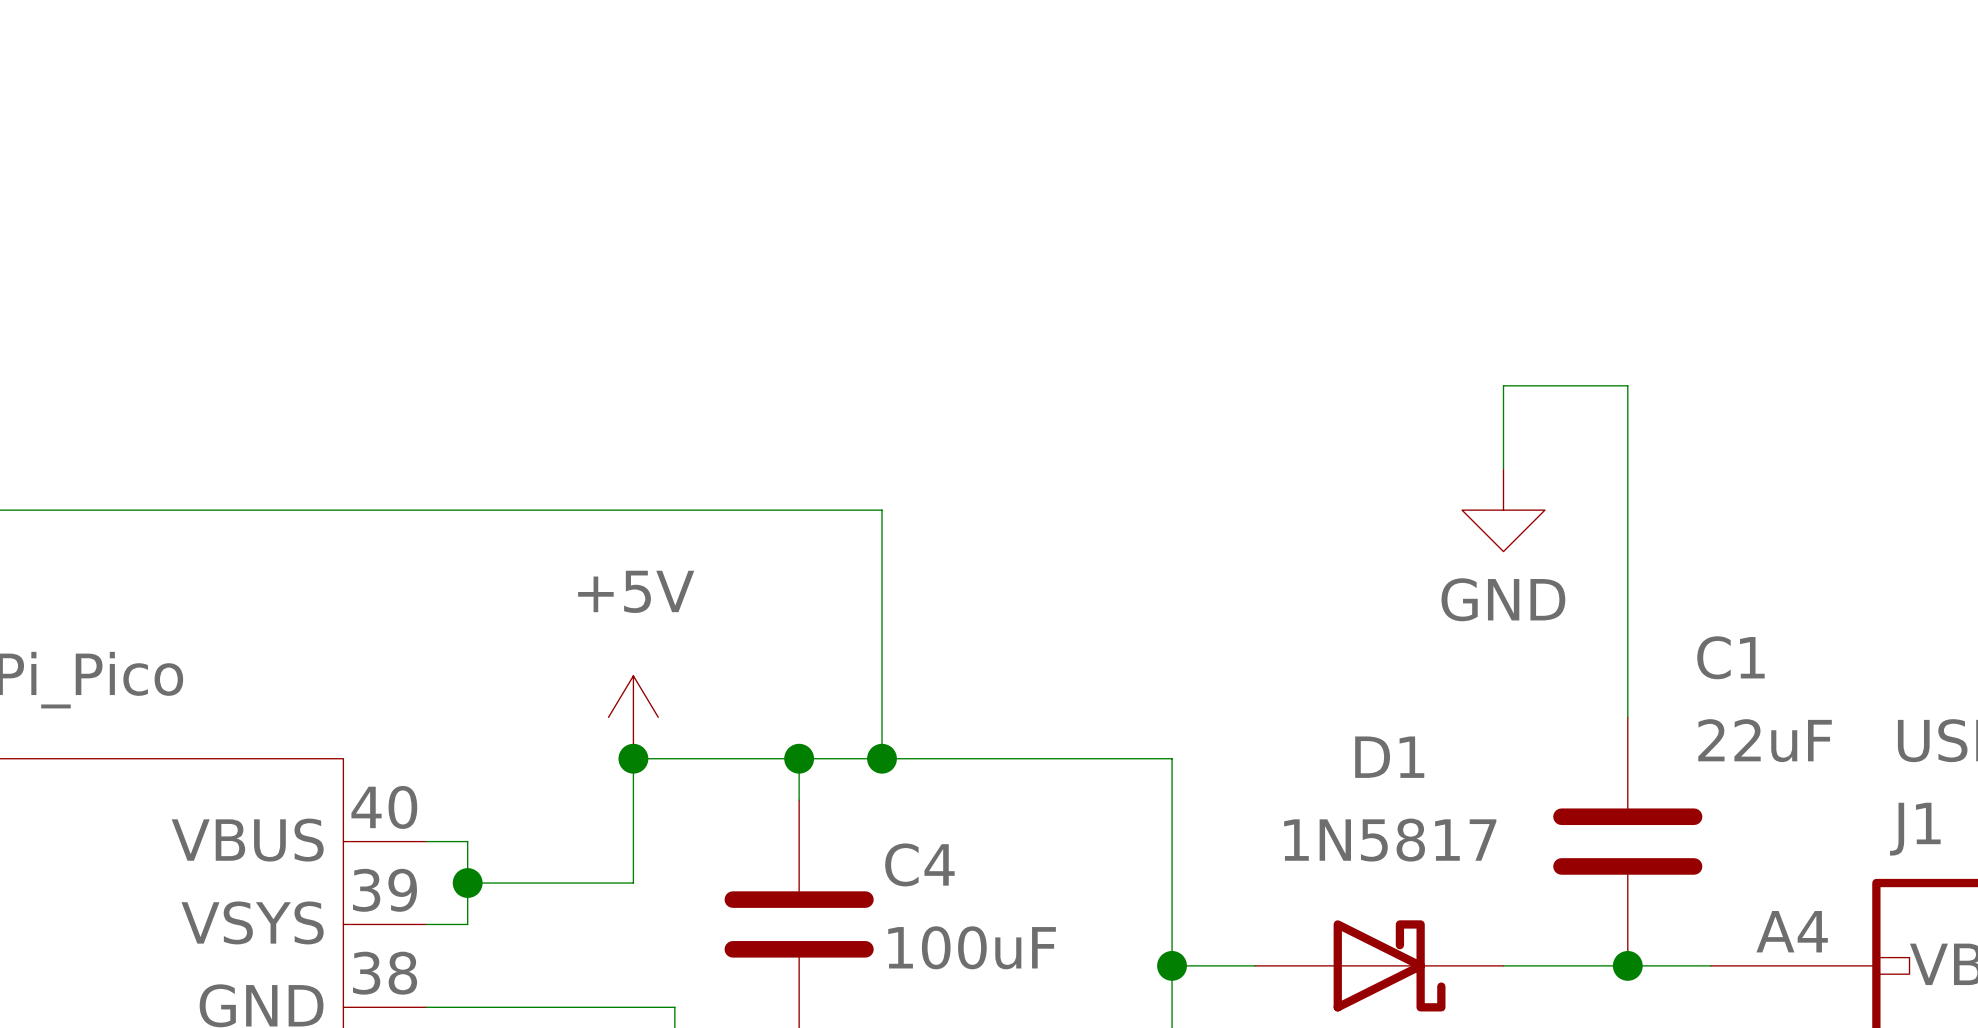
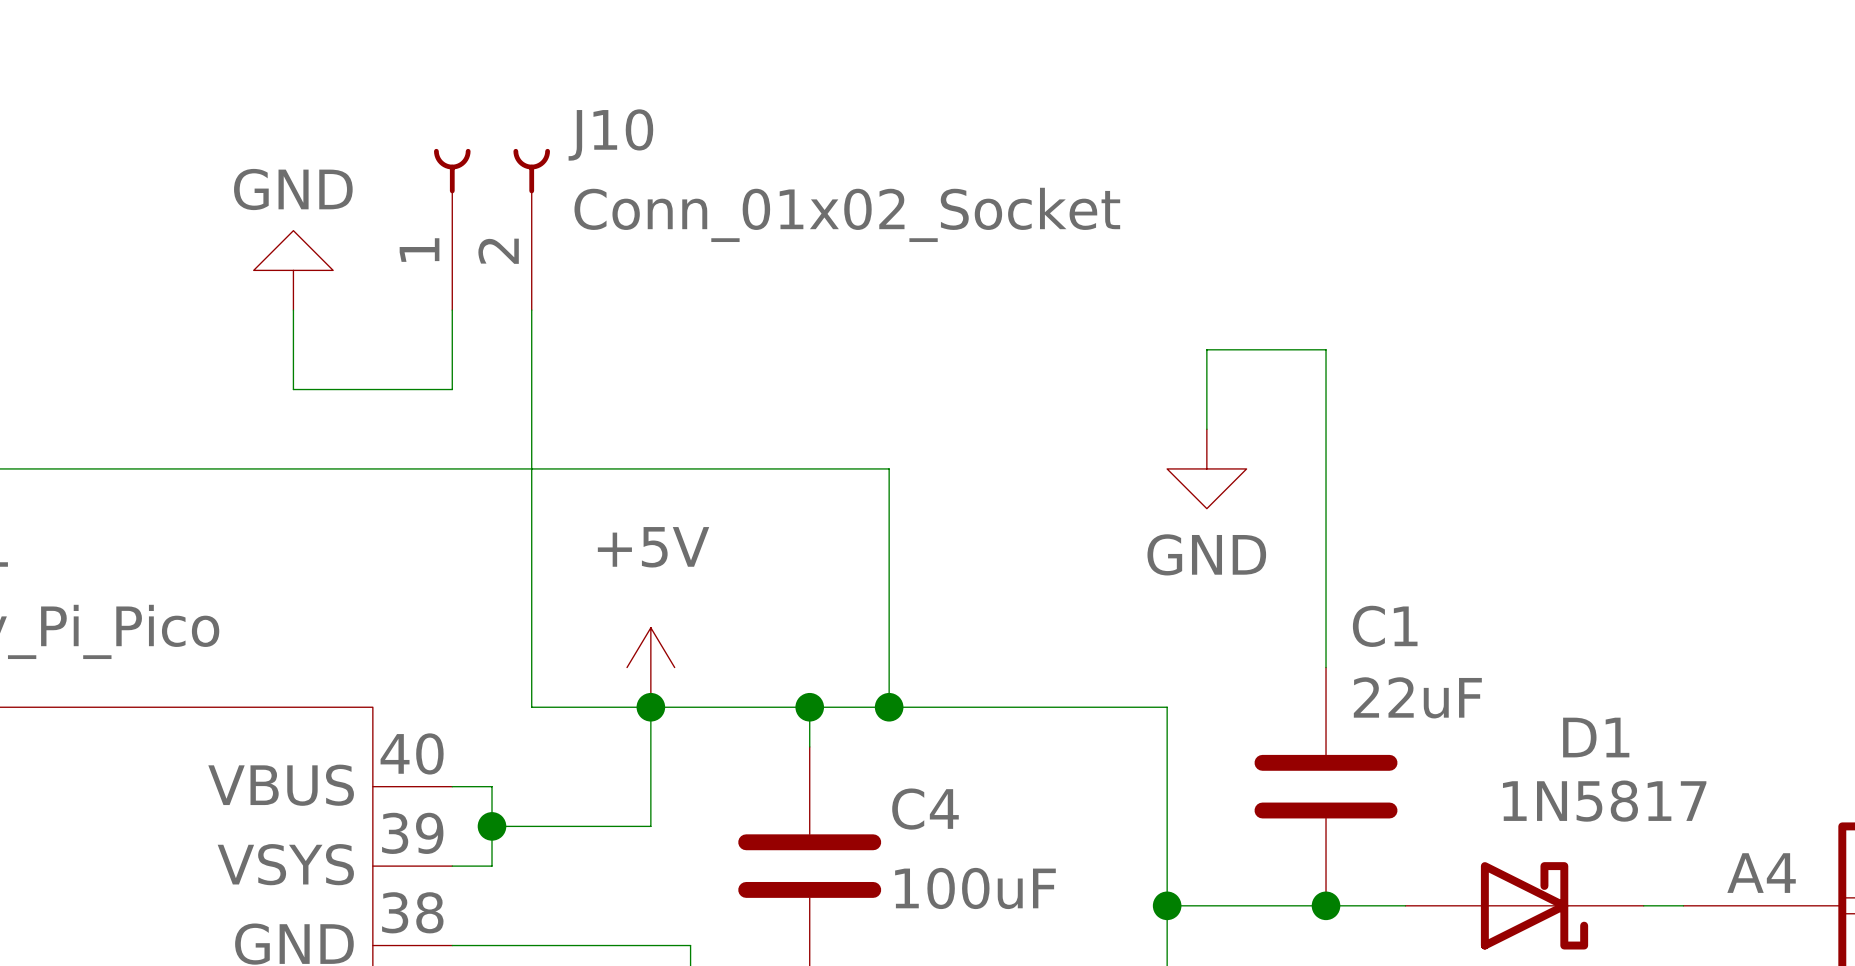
J10: none -> Conn_01x02_Socket (492, 229)
power symbol: none -> GND (293, 270)
wire: none -> (293, 310) (293, 389) (452, 389) (452, 310)
wire: none -> (531, 310) (531, 707) (650, 707)
wire: (1503, 468) (1503, 385) (1627, 385) (1627, 717) -> (1206, 429) (1206, 349) (1326, 349) (1326, 667)
power symbol position: GND (1503, 510) -> GND (1206, 468)
C1 name position: C1 (1730, 657) -> C1 (1385, 626)
C1 value position: 22uF (1765, 740) -> 22uF (1417, 697)
D1 name position: D1 (1389, 757) -> D1 (1596, 737)
D1 value position: 1N5817 (1390, 840) -> 1N5817 (1604, 801)
C1 position: (1627, 841) -> (1326, 786)
junction: none -> (1326, 905)
D1 position: (1379, 965) -> (1524, 905)
junction: (1627, 965) -> none

